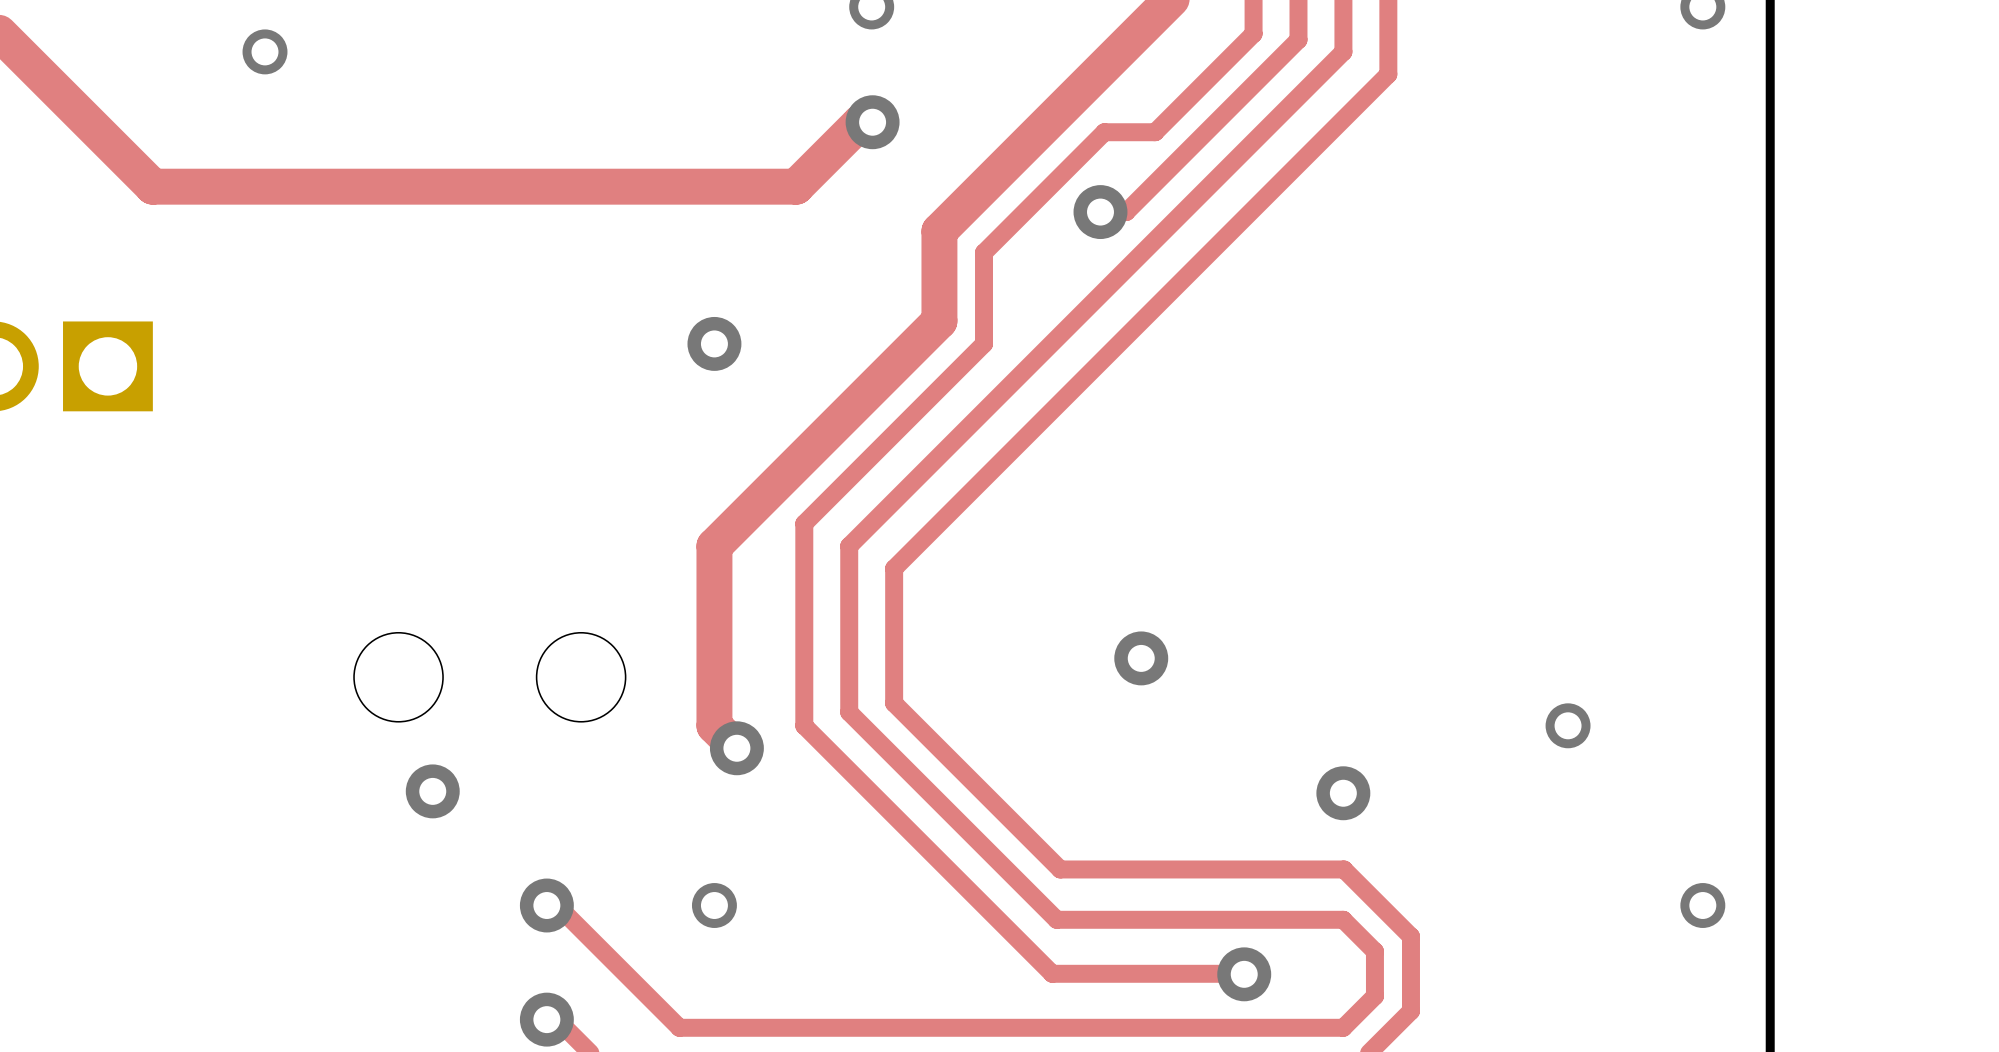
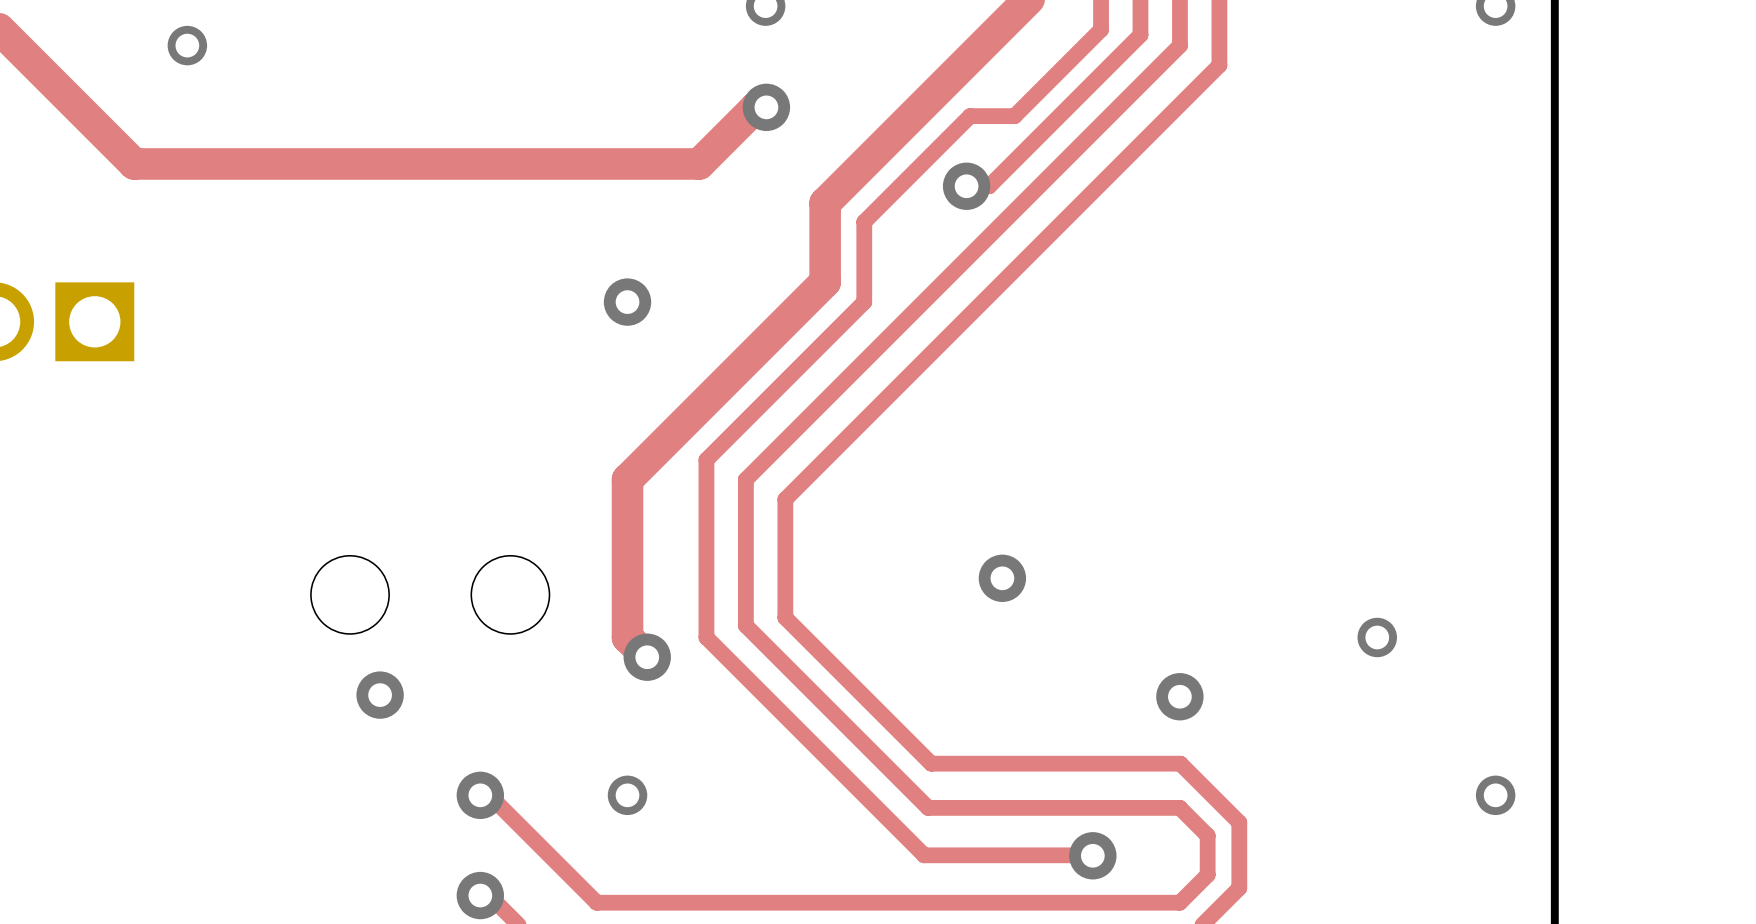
via position: (265, 51) -> (187, 45)

